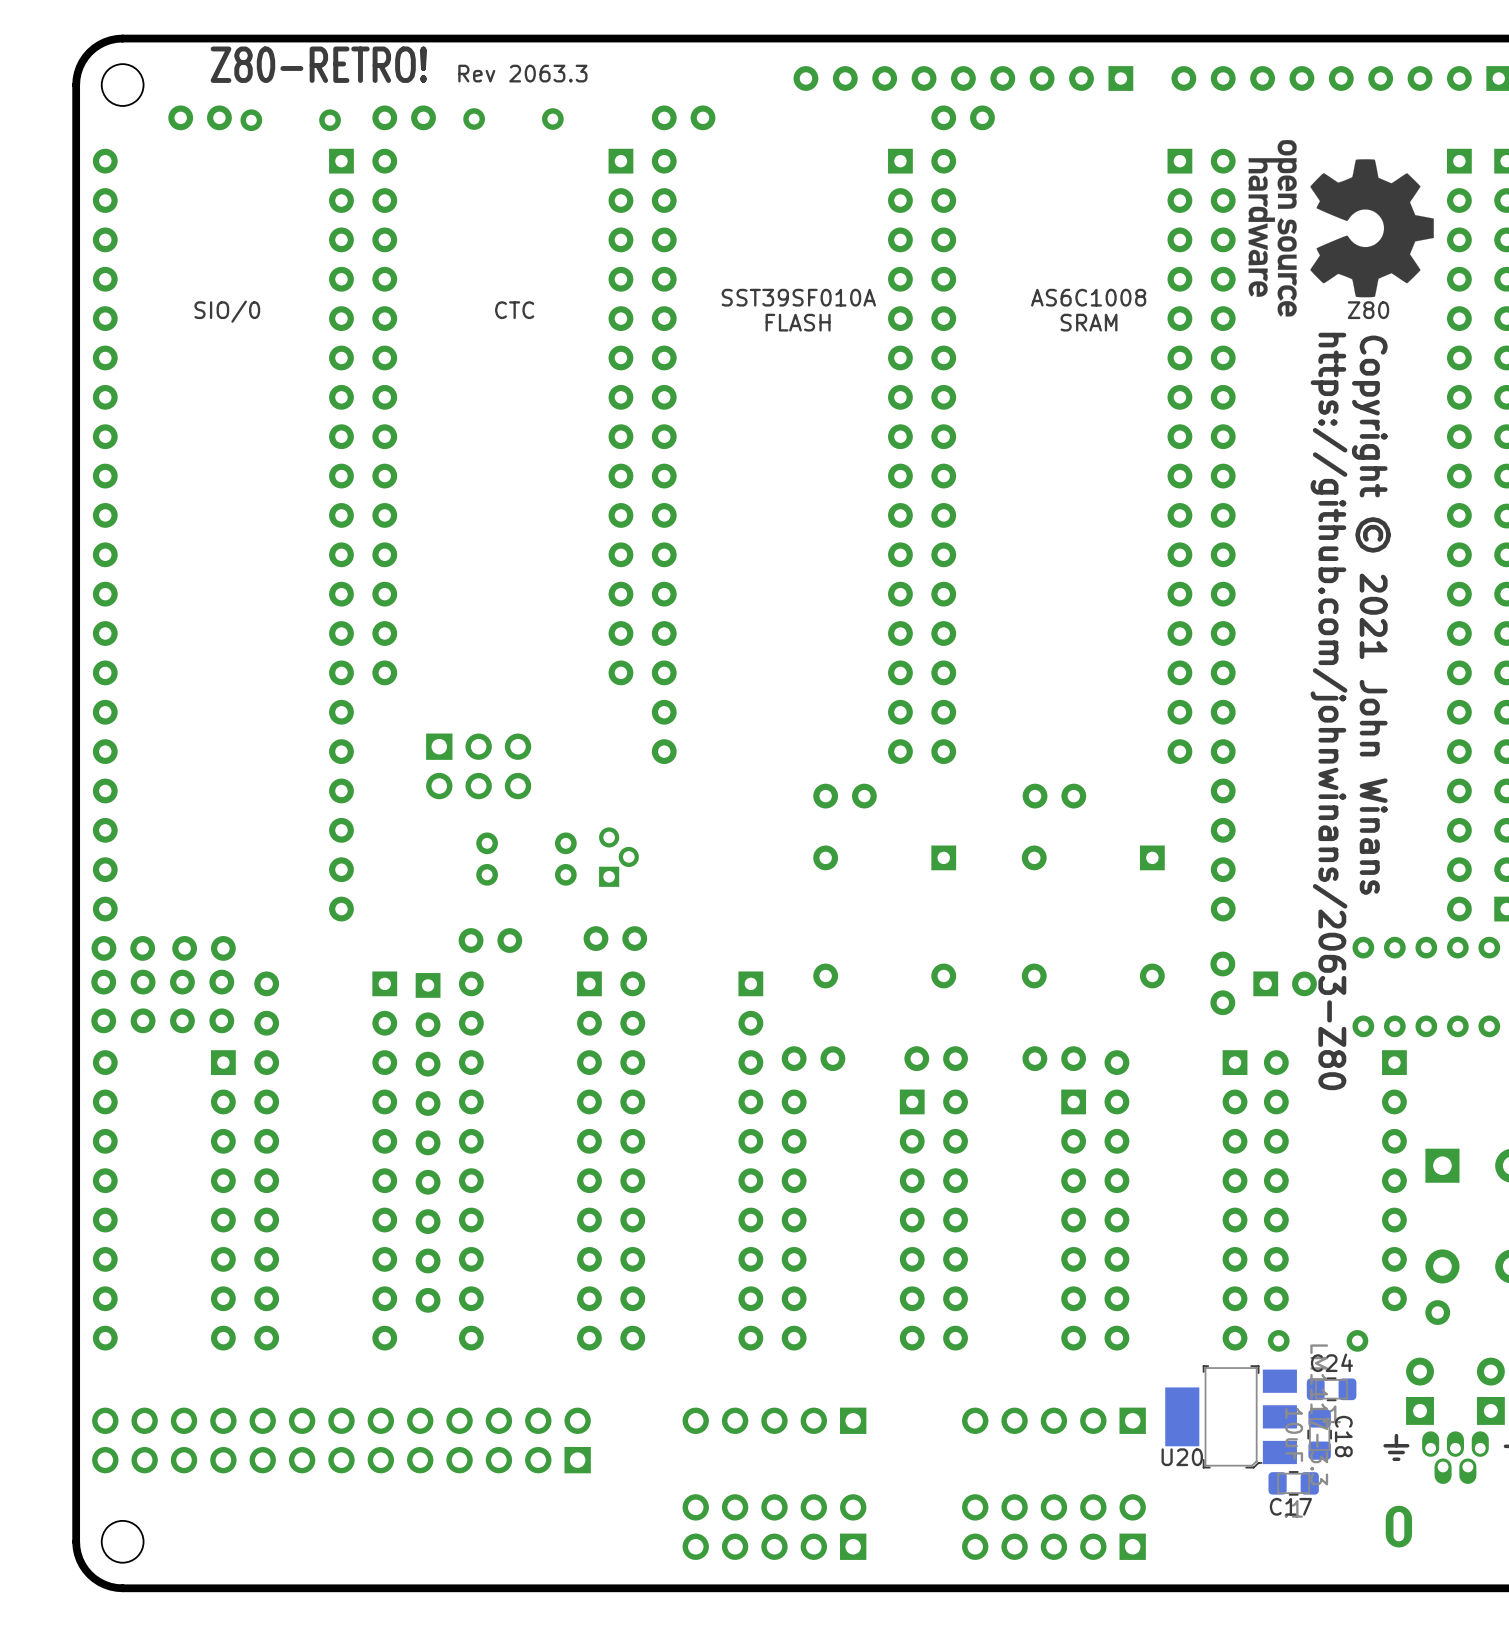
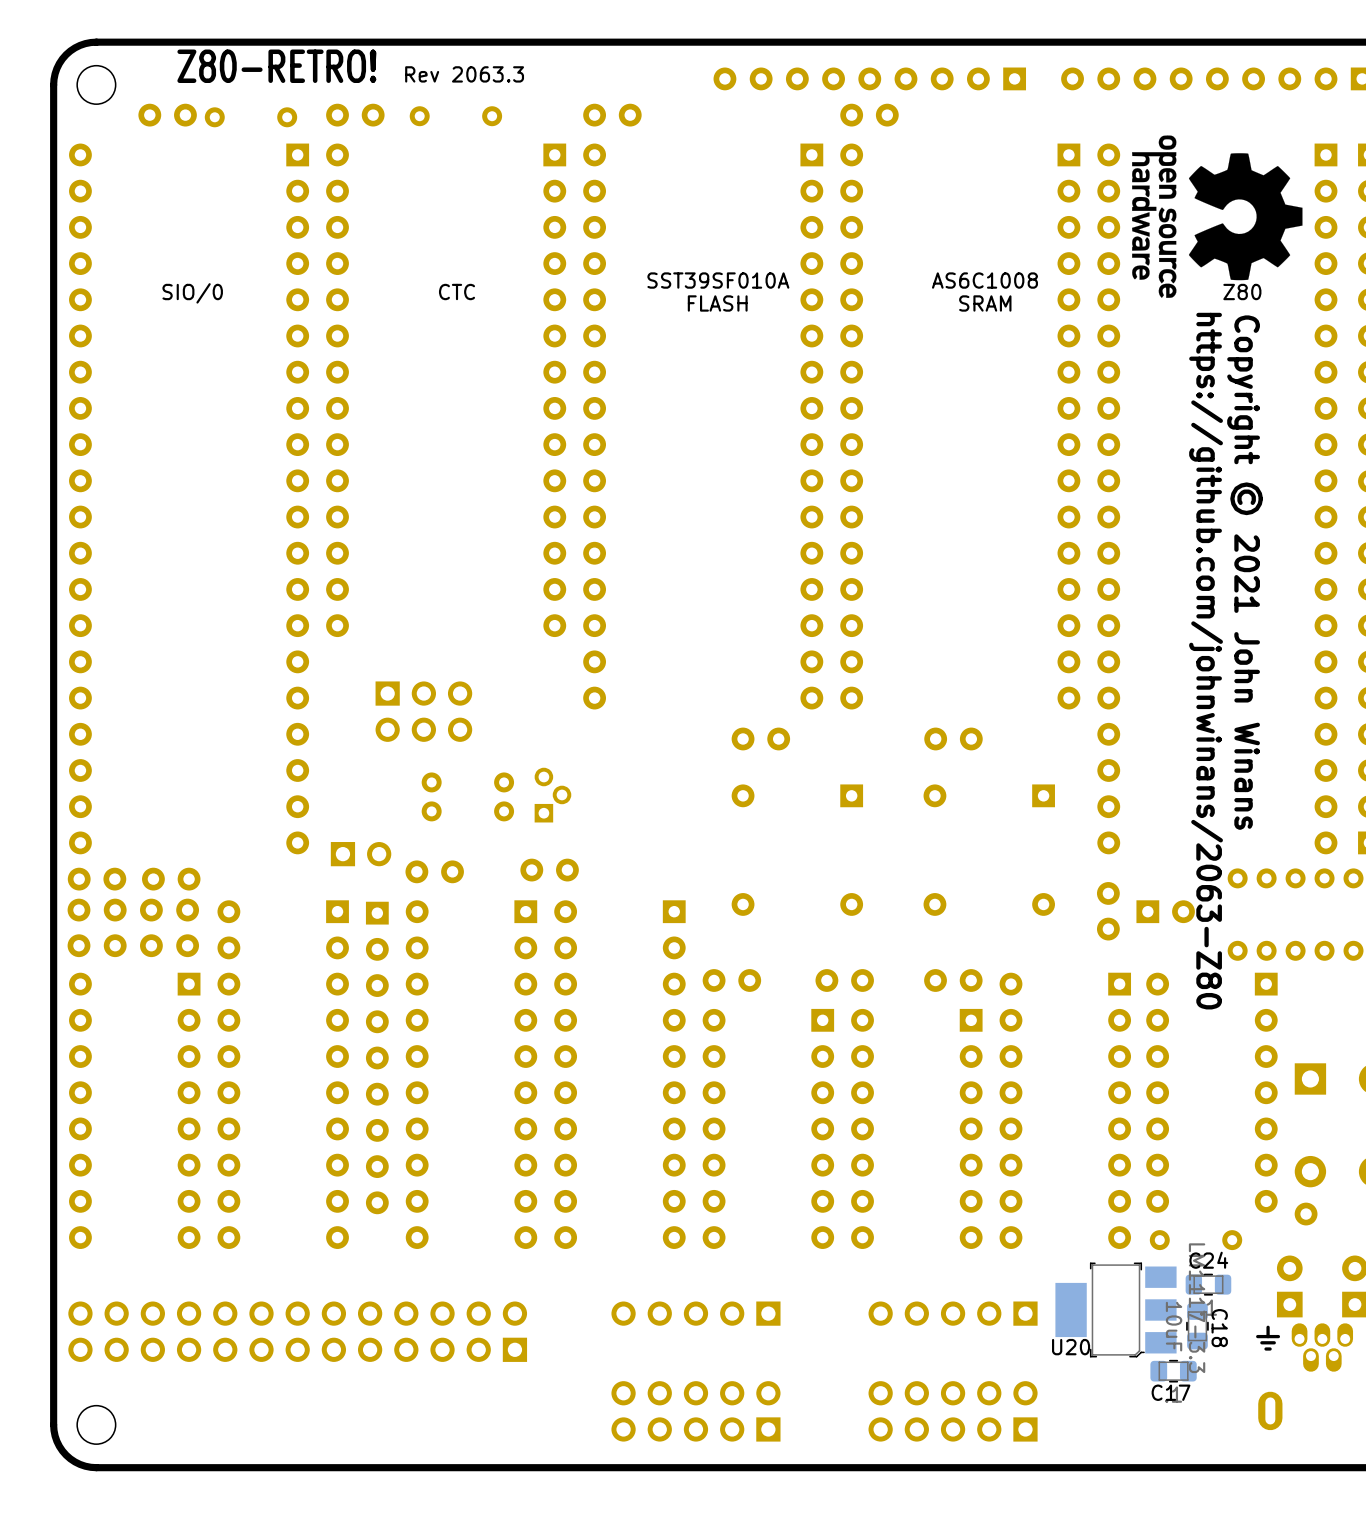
part: none -> (361, 854)

